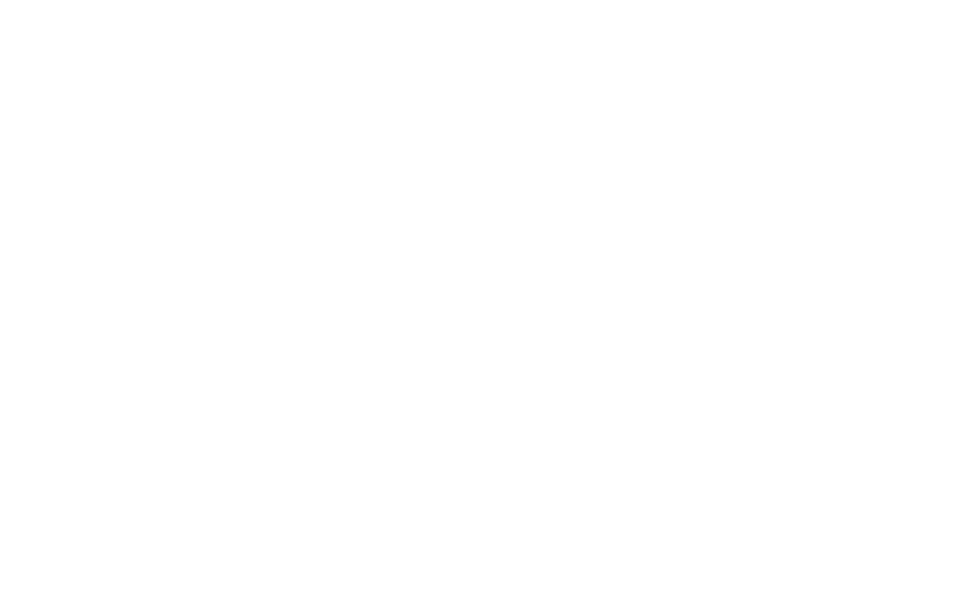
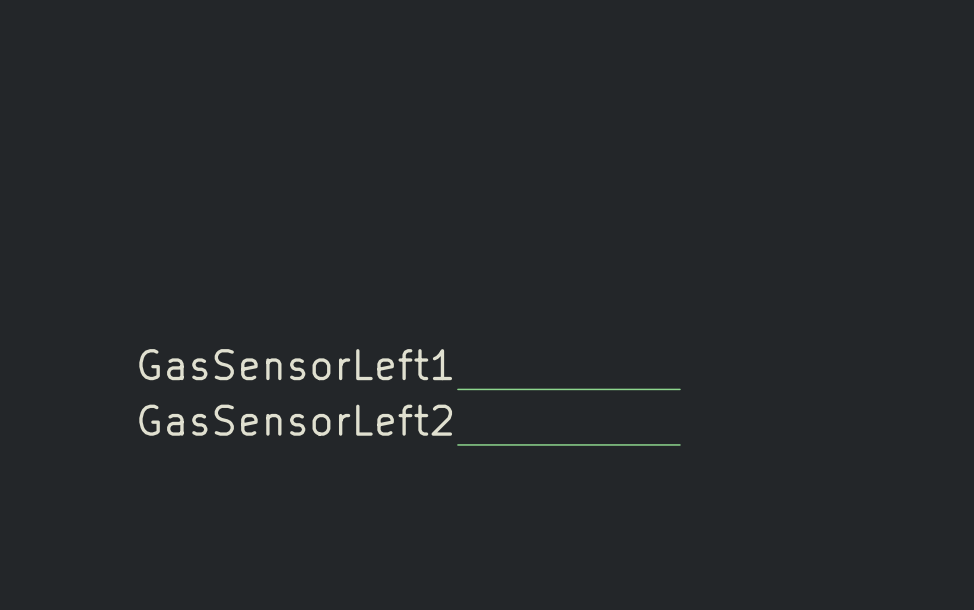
label: none -> GasSensorLeft1 (295, 364)
wire: none -> (457, 389) (680, 389)
label: none -> GasSensorLeft2 (295, 420)
wire: none -> (457, 444) (680, 444)

